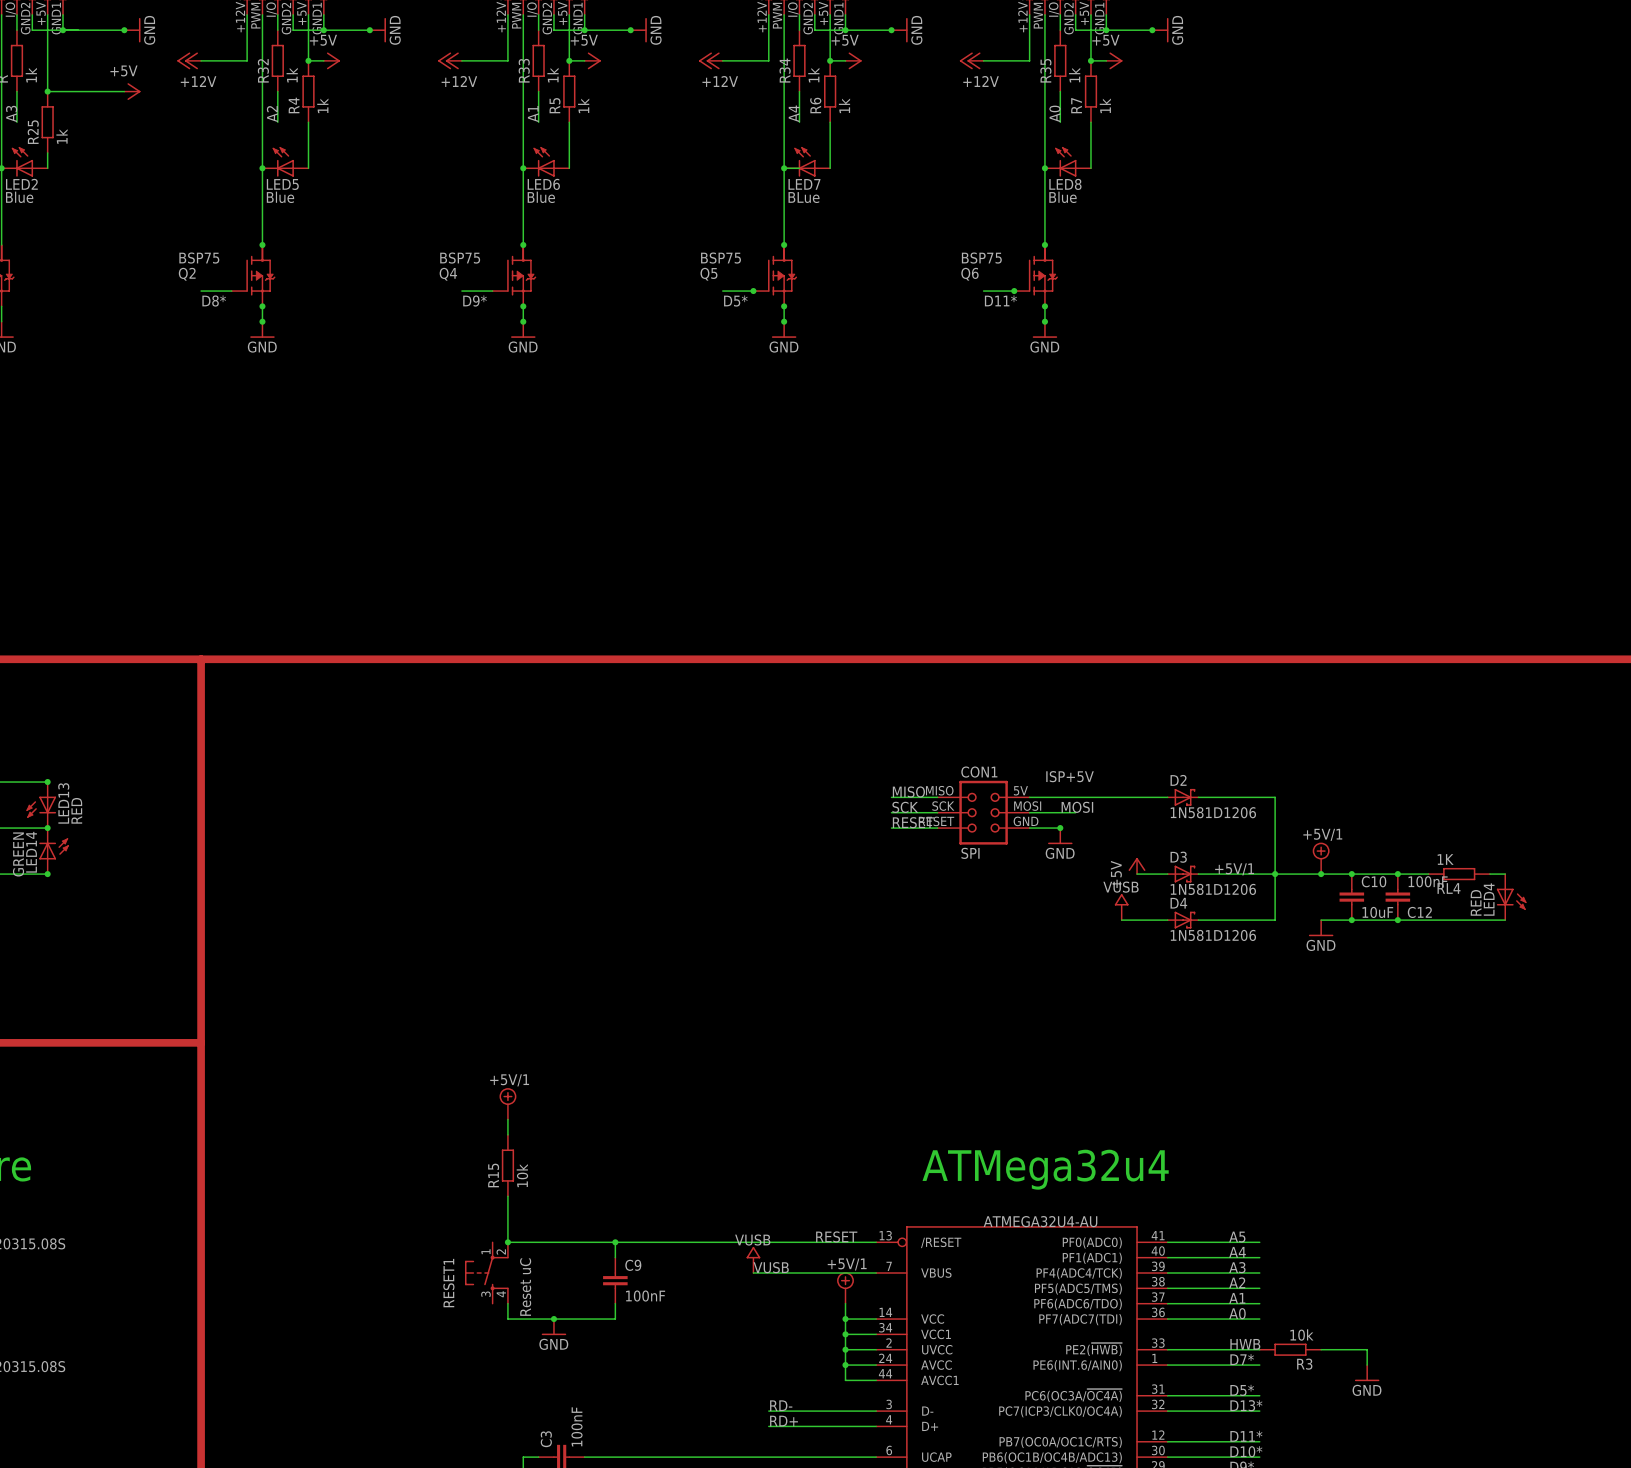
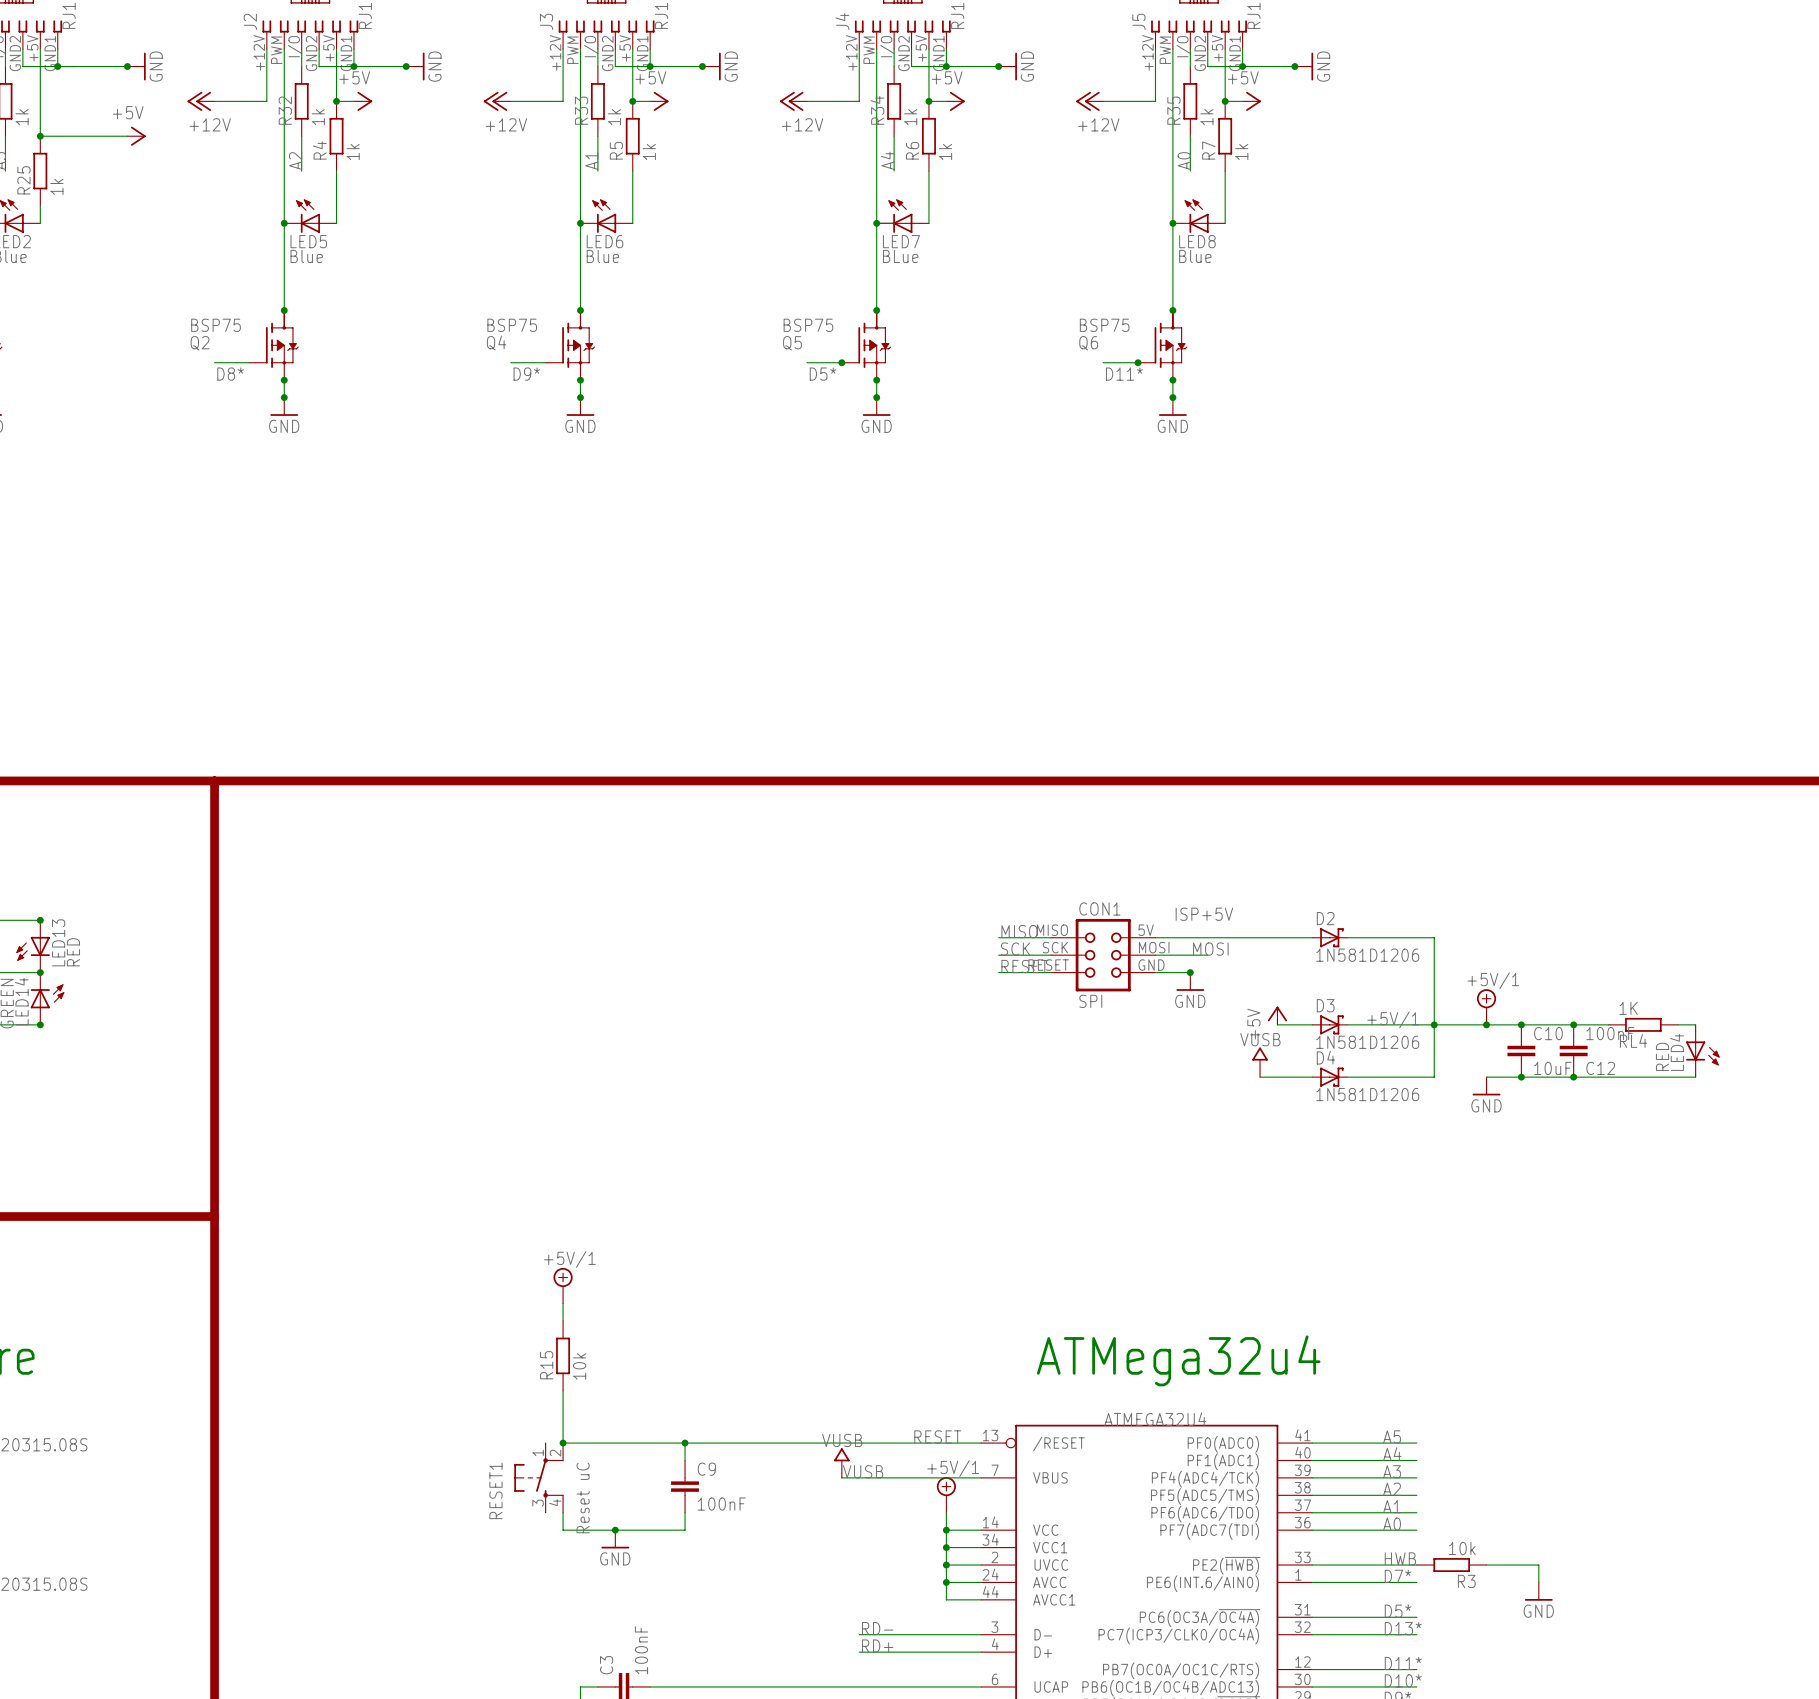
part value: ATMEGA32U4-AU (1040, 1221) -> ATMEGA32U4 (1155, 1419)

